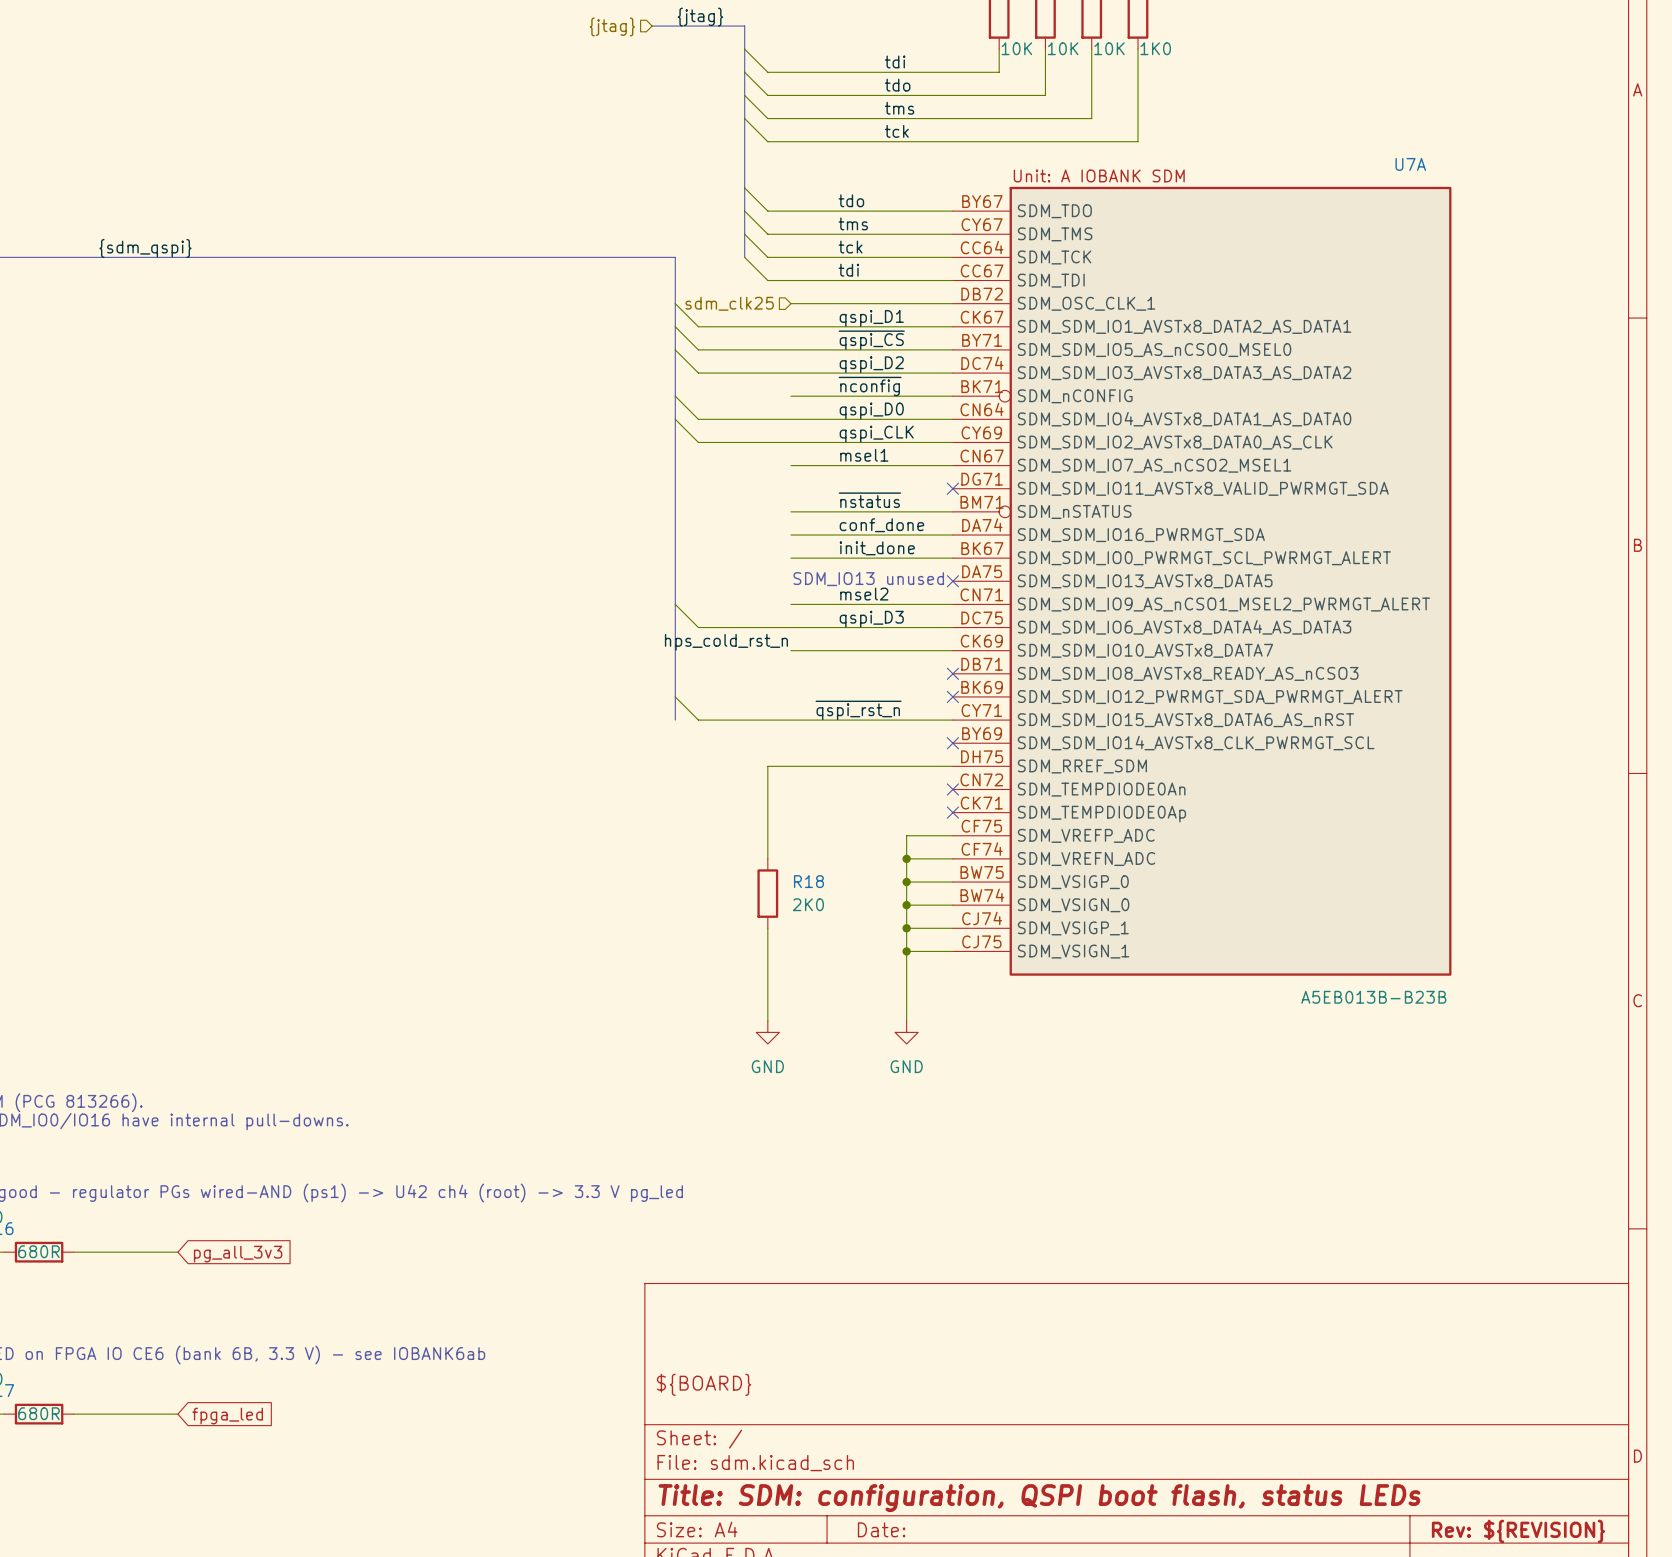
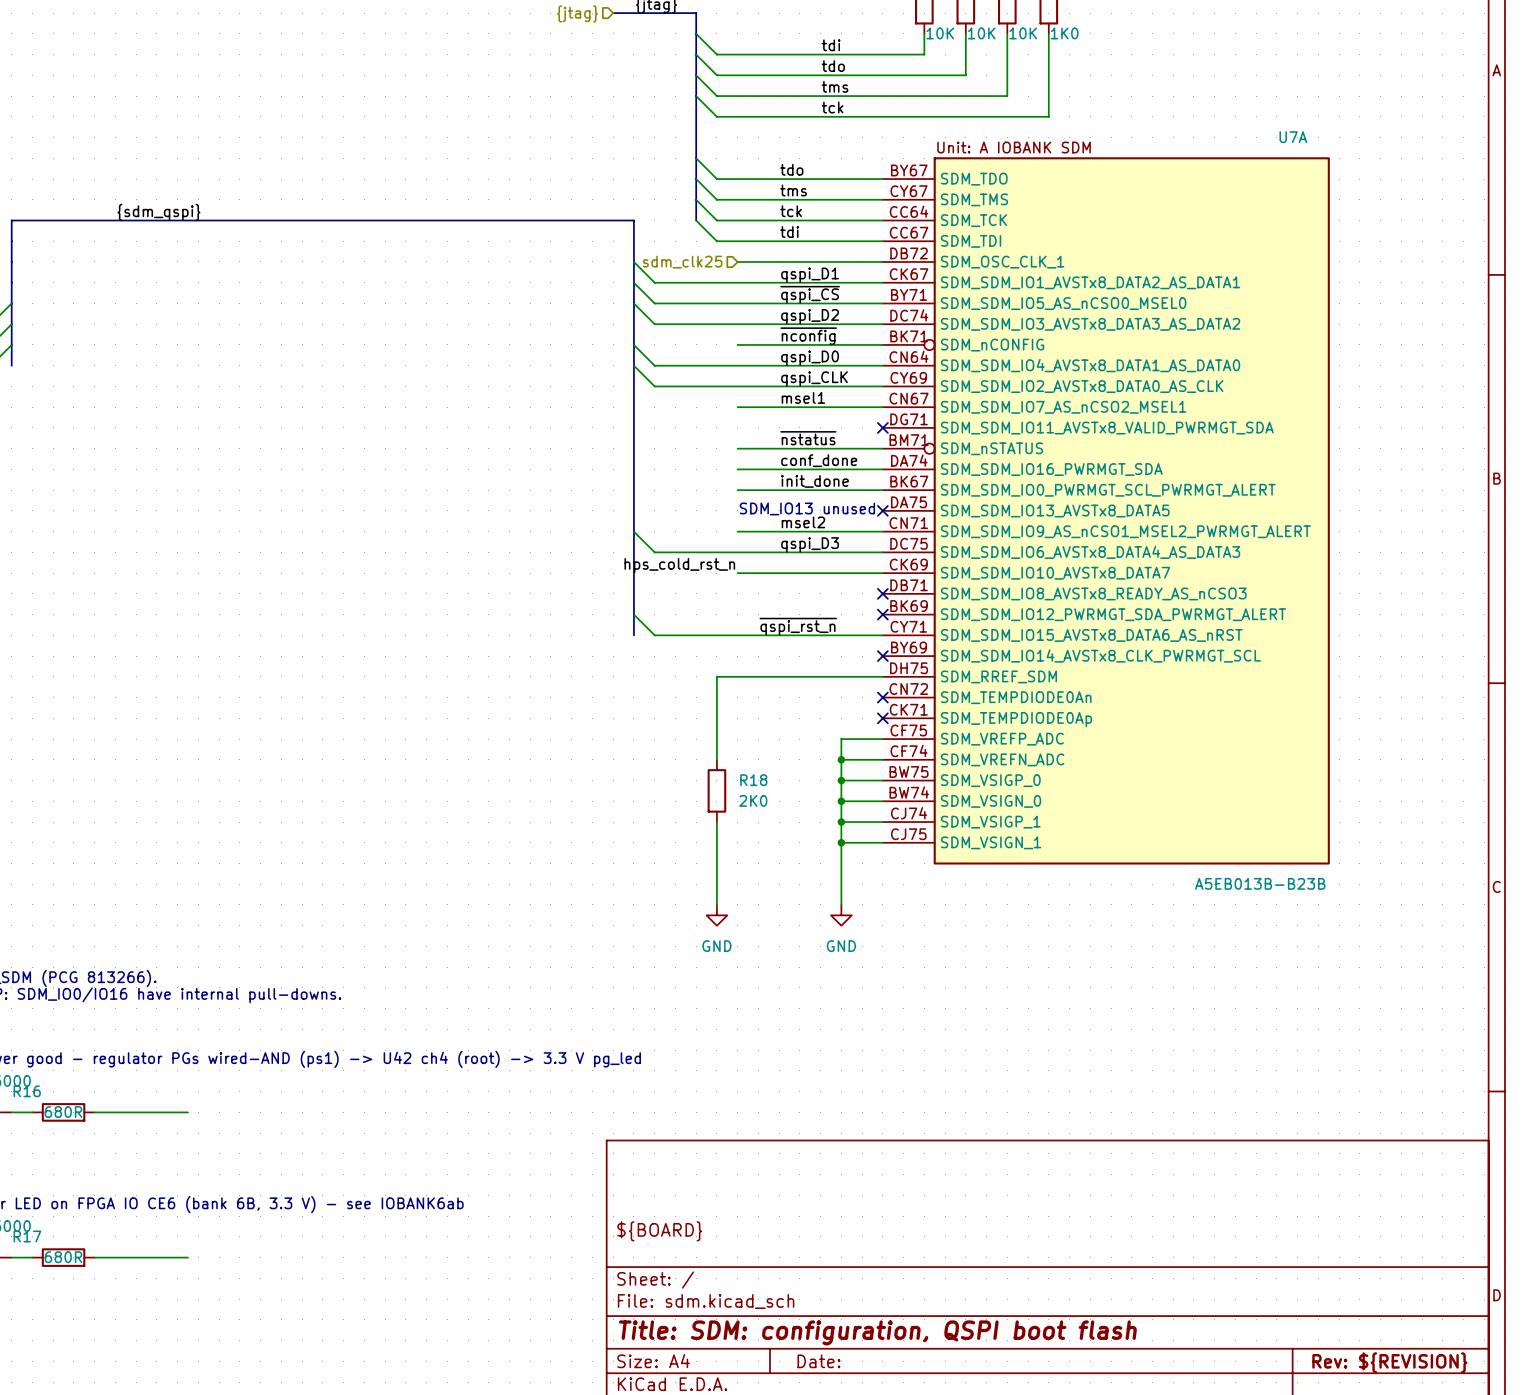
global label: pg_all_3v3 (238, 1254) -> none
global label: fpga_led (227, 1416) -> none
title block: Title: SDM: configuration, QSPI boot flash, status LEDs (1039, 1498) -> Title: SDM: configuration, QSPI boot flash (877, 1332)

